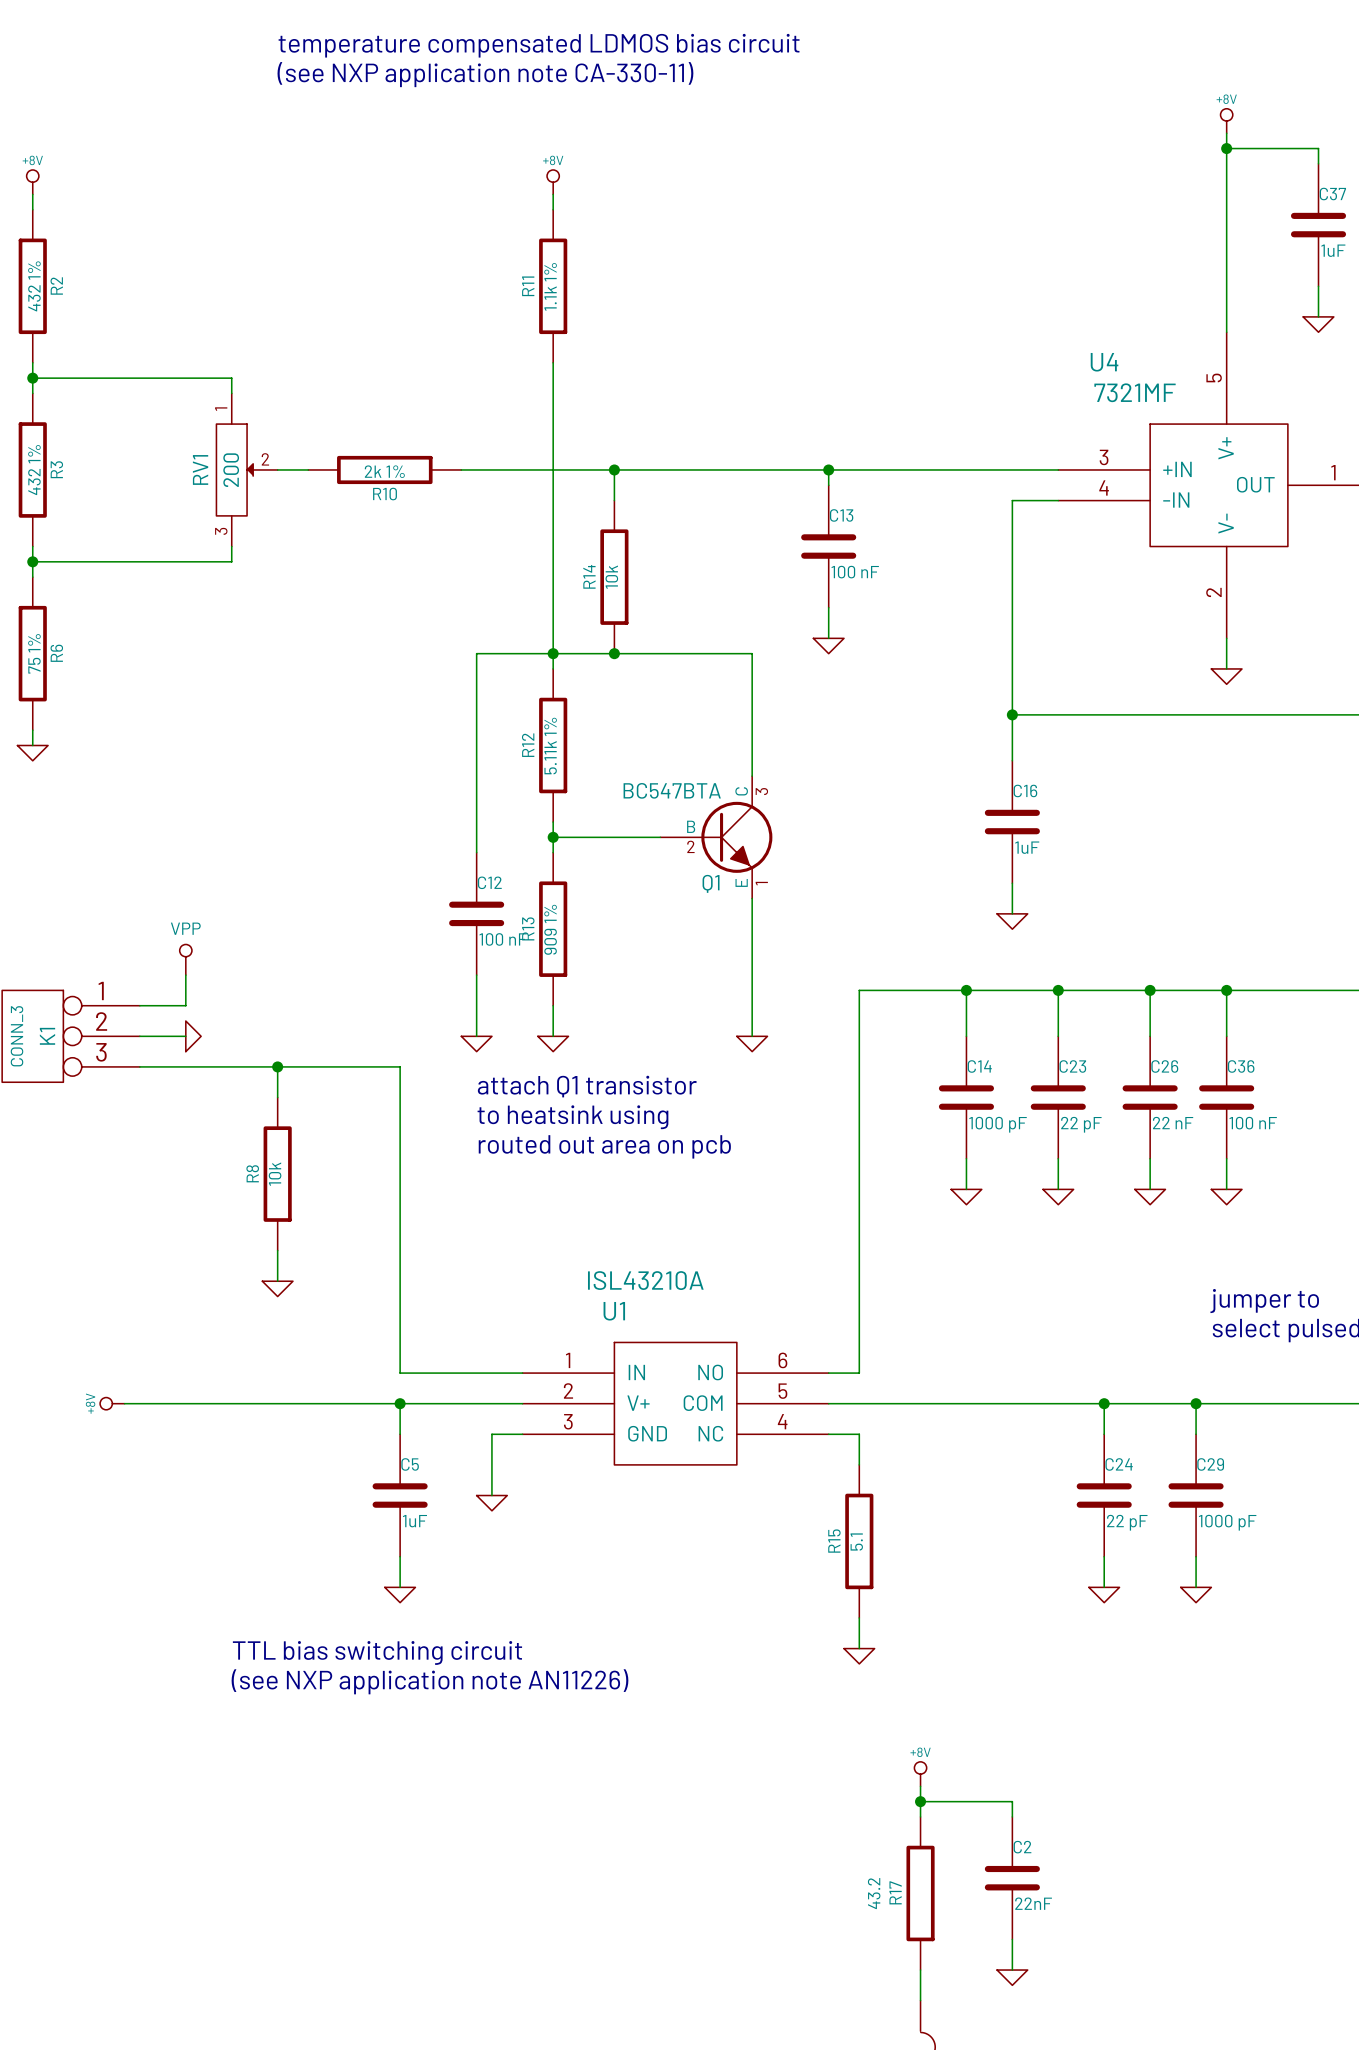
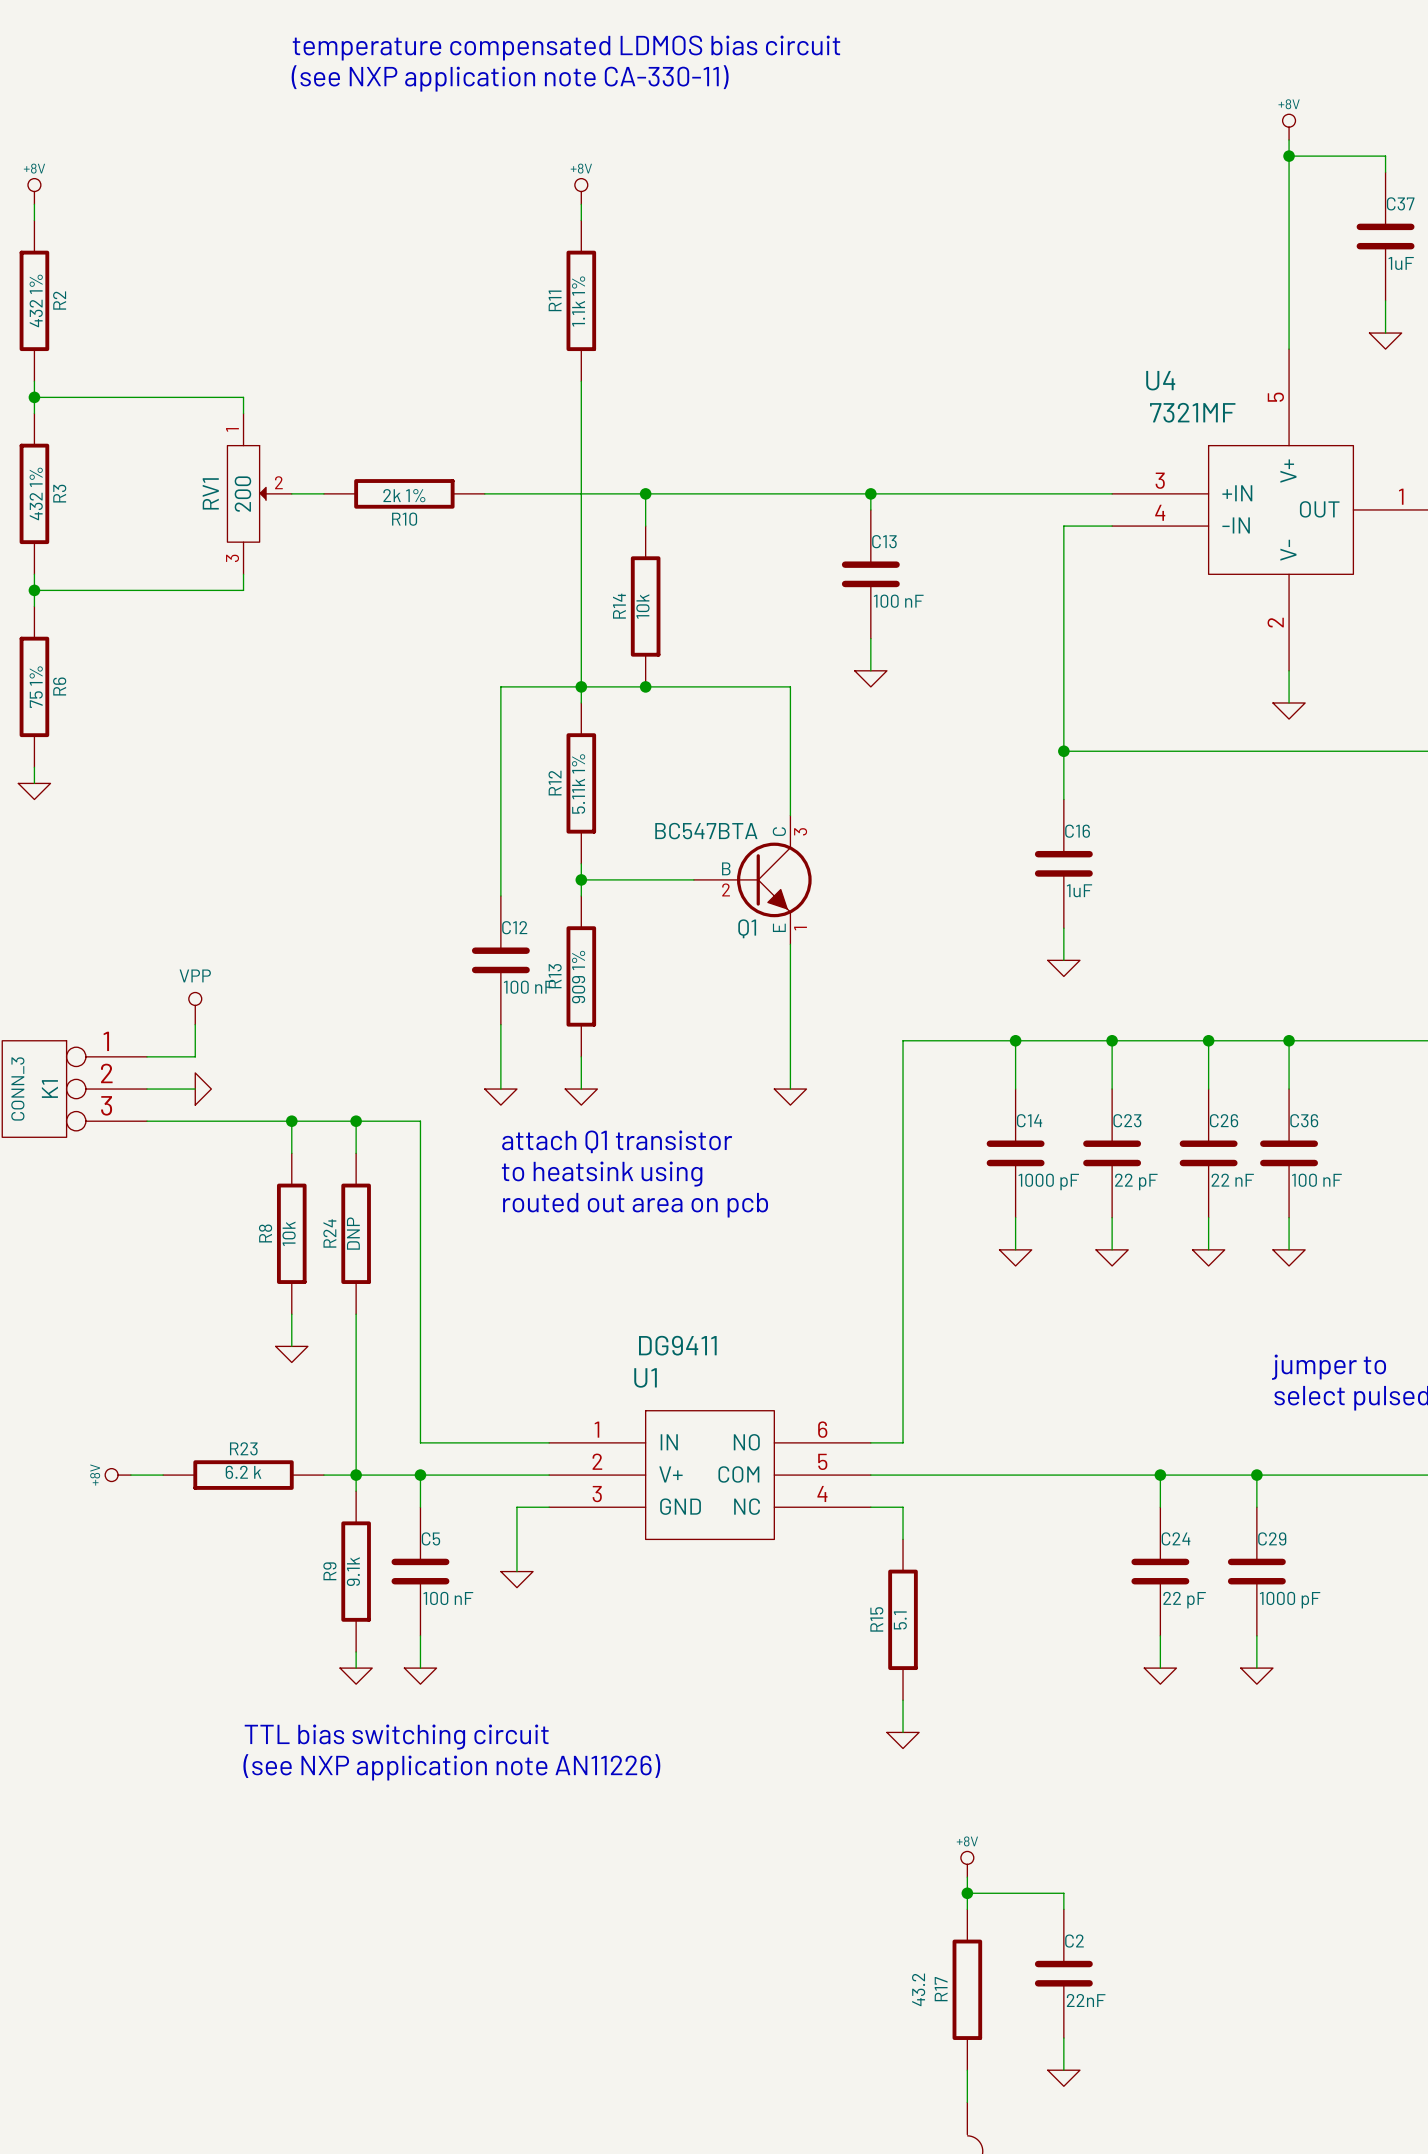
wire: none -> (356, 1121) (356, 1153)
junction: none -> (356, 1121)
R24: none -> DNP (356, 1233)
wire: none -> (356, 1314) (356, 1491)
U1 value: ISL43210A (645, 1280) -> DG9411 (677, 1345)
wire: (155, 1403) (308, 1403) -> none
R23: none -> 6.2 k (243, 1475)
junction: none -> (356, 1475)
R9: none -> 9.1k (356, 1571)
C5 value: 1uF (414, 1521) -> 100 nF (448, 1598)
wire: none -> (356, 1652) (356, 1668)
power symbol: none -> (356, 1676)

